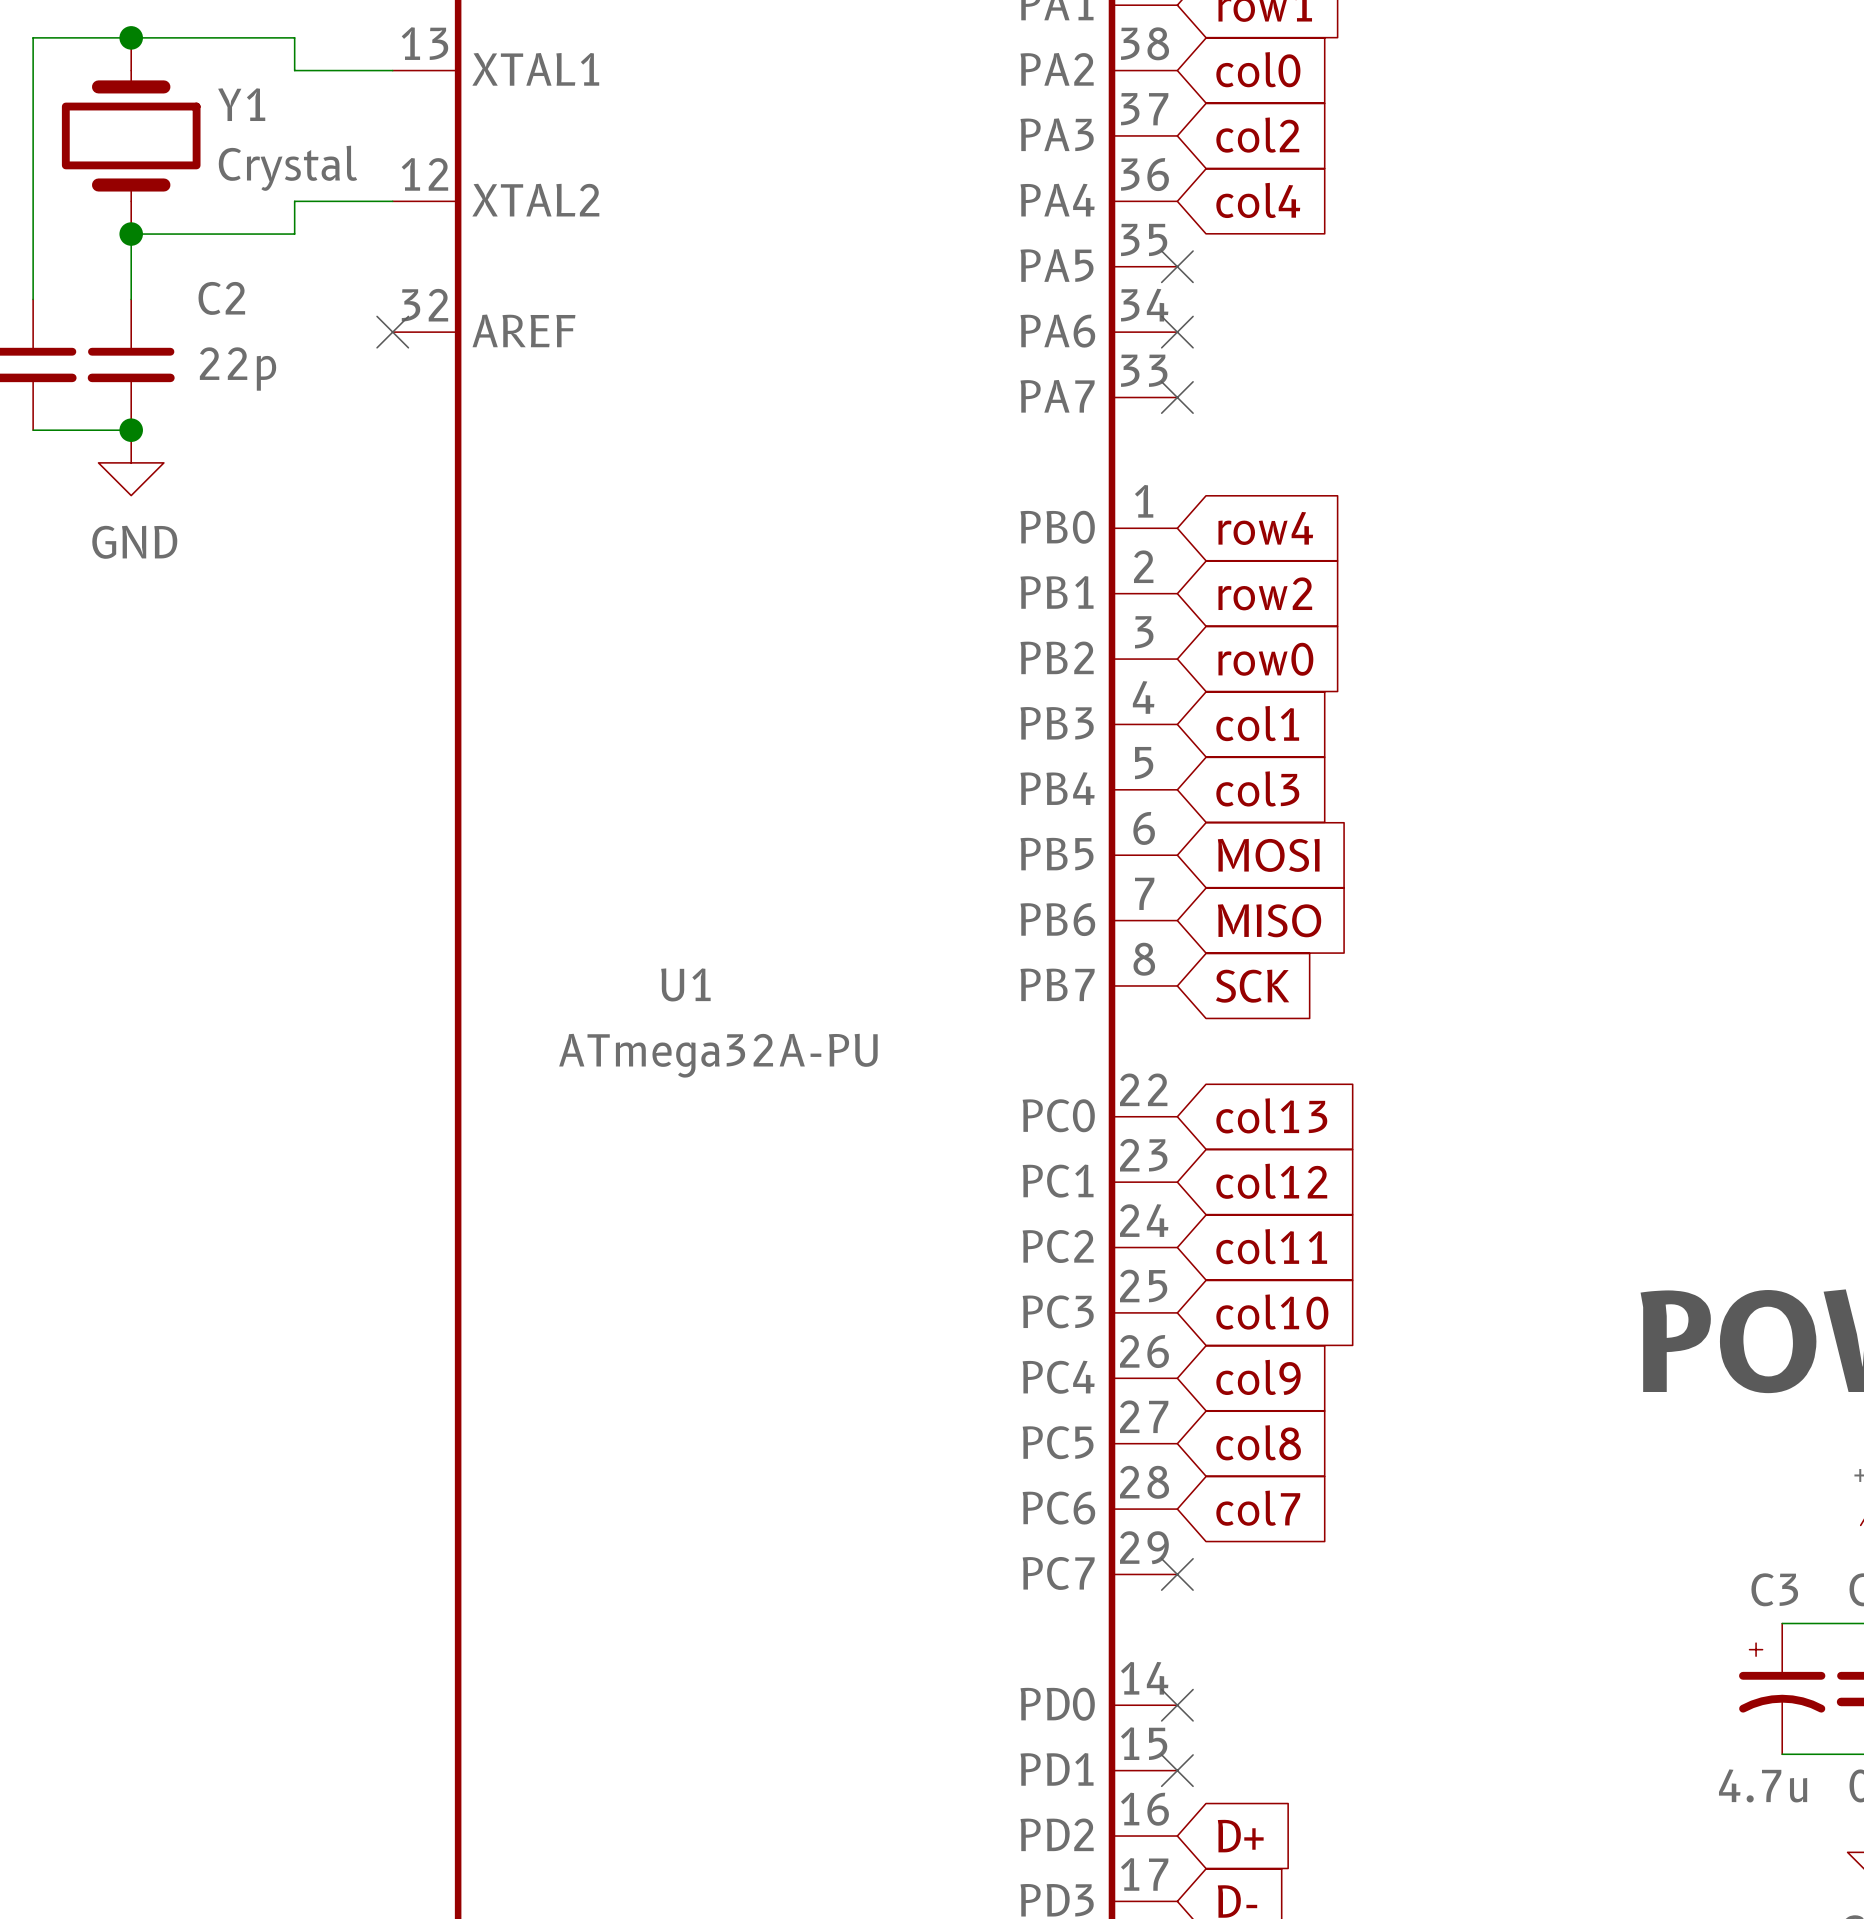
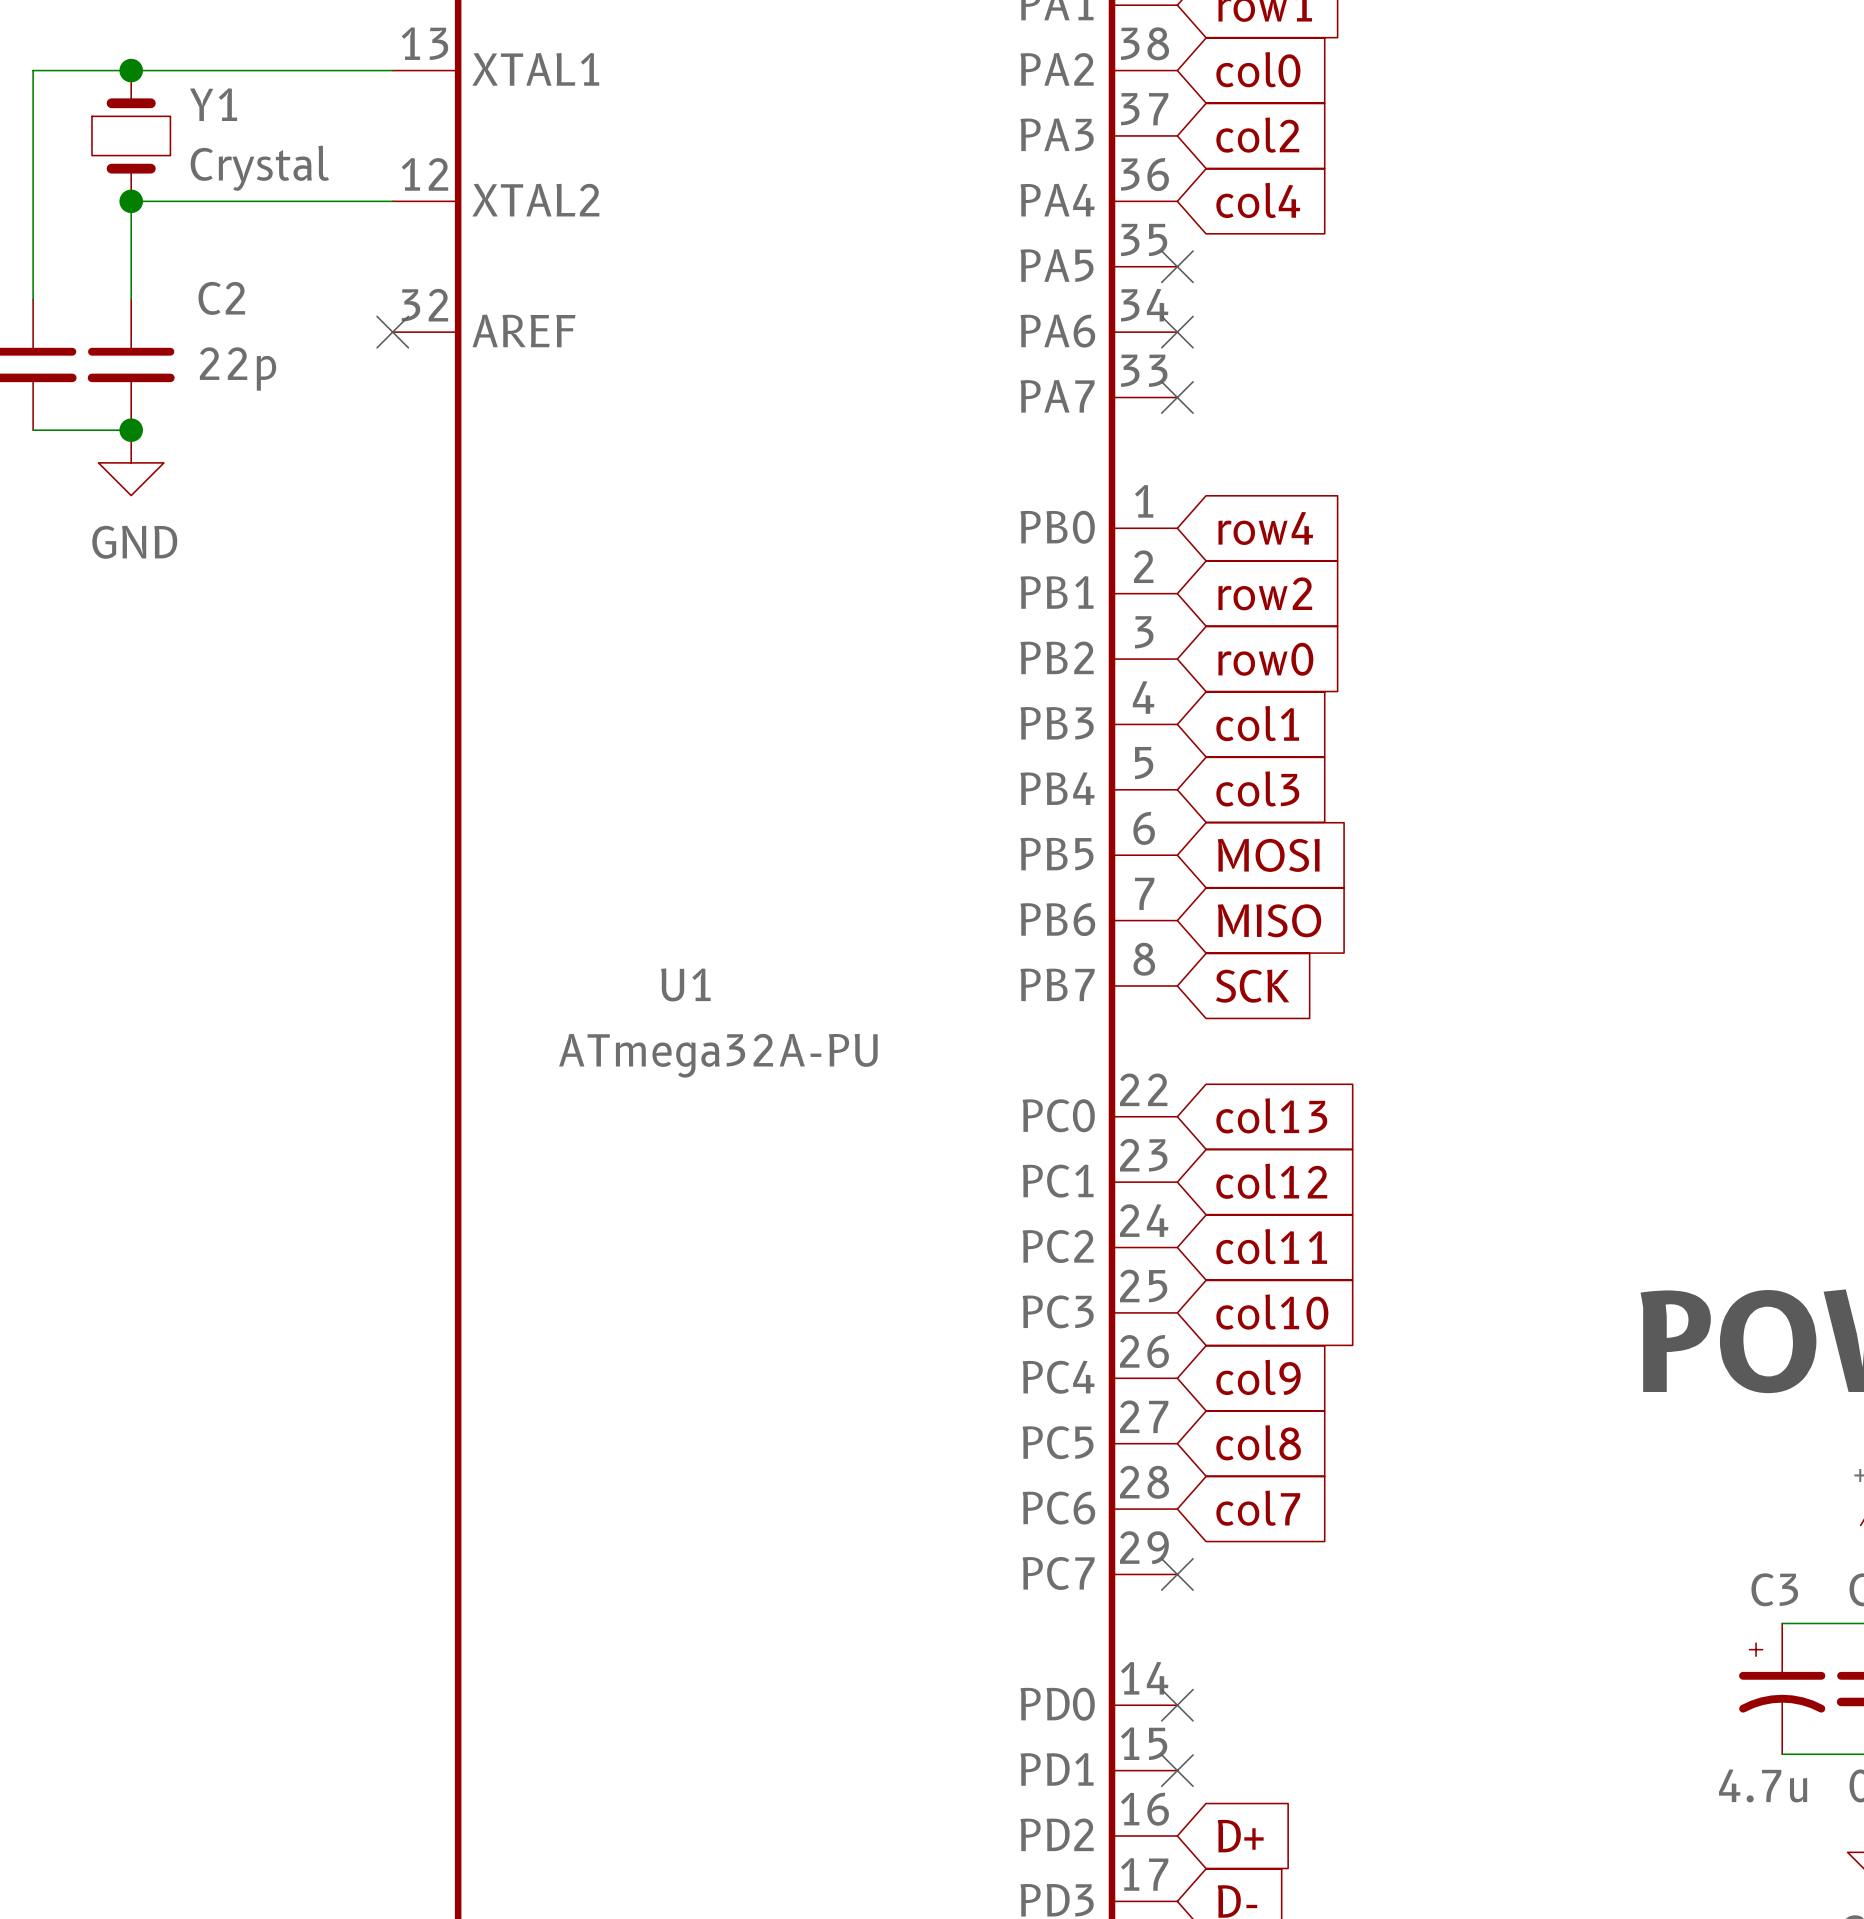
Y1 symbol: [61, 37, 201, 235] -> [91, 70, 171, 202]
junction position: (131, 37) -> (131, 70)
wire: (33, 70) (33, 37) (294, 37) (294, 70) -> (33, 70) (294, 70)
wire: (294, 201) (294, 234) (131, 234) -> (294, 201) (131, 201) (131, 234)
junction position: (131, 234) -> (131, 201)

